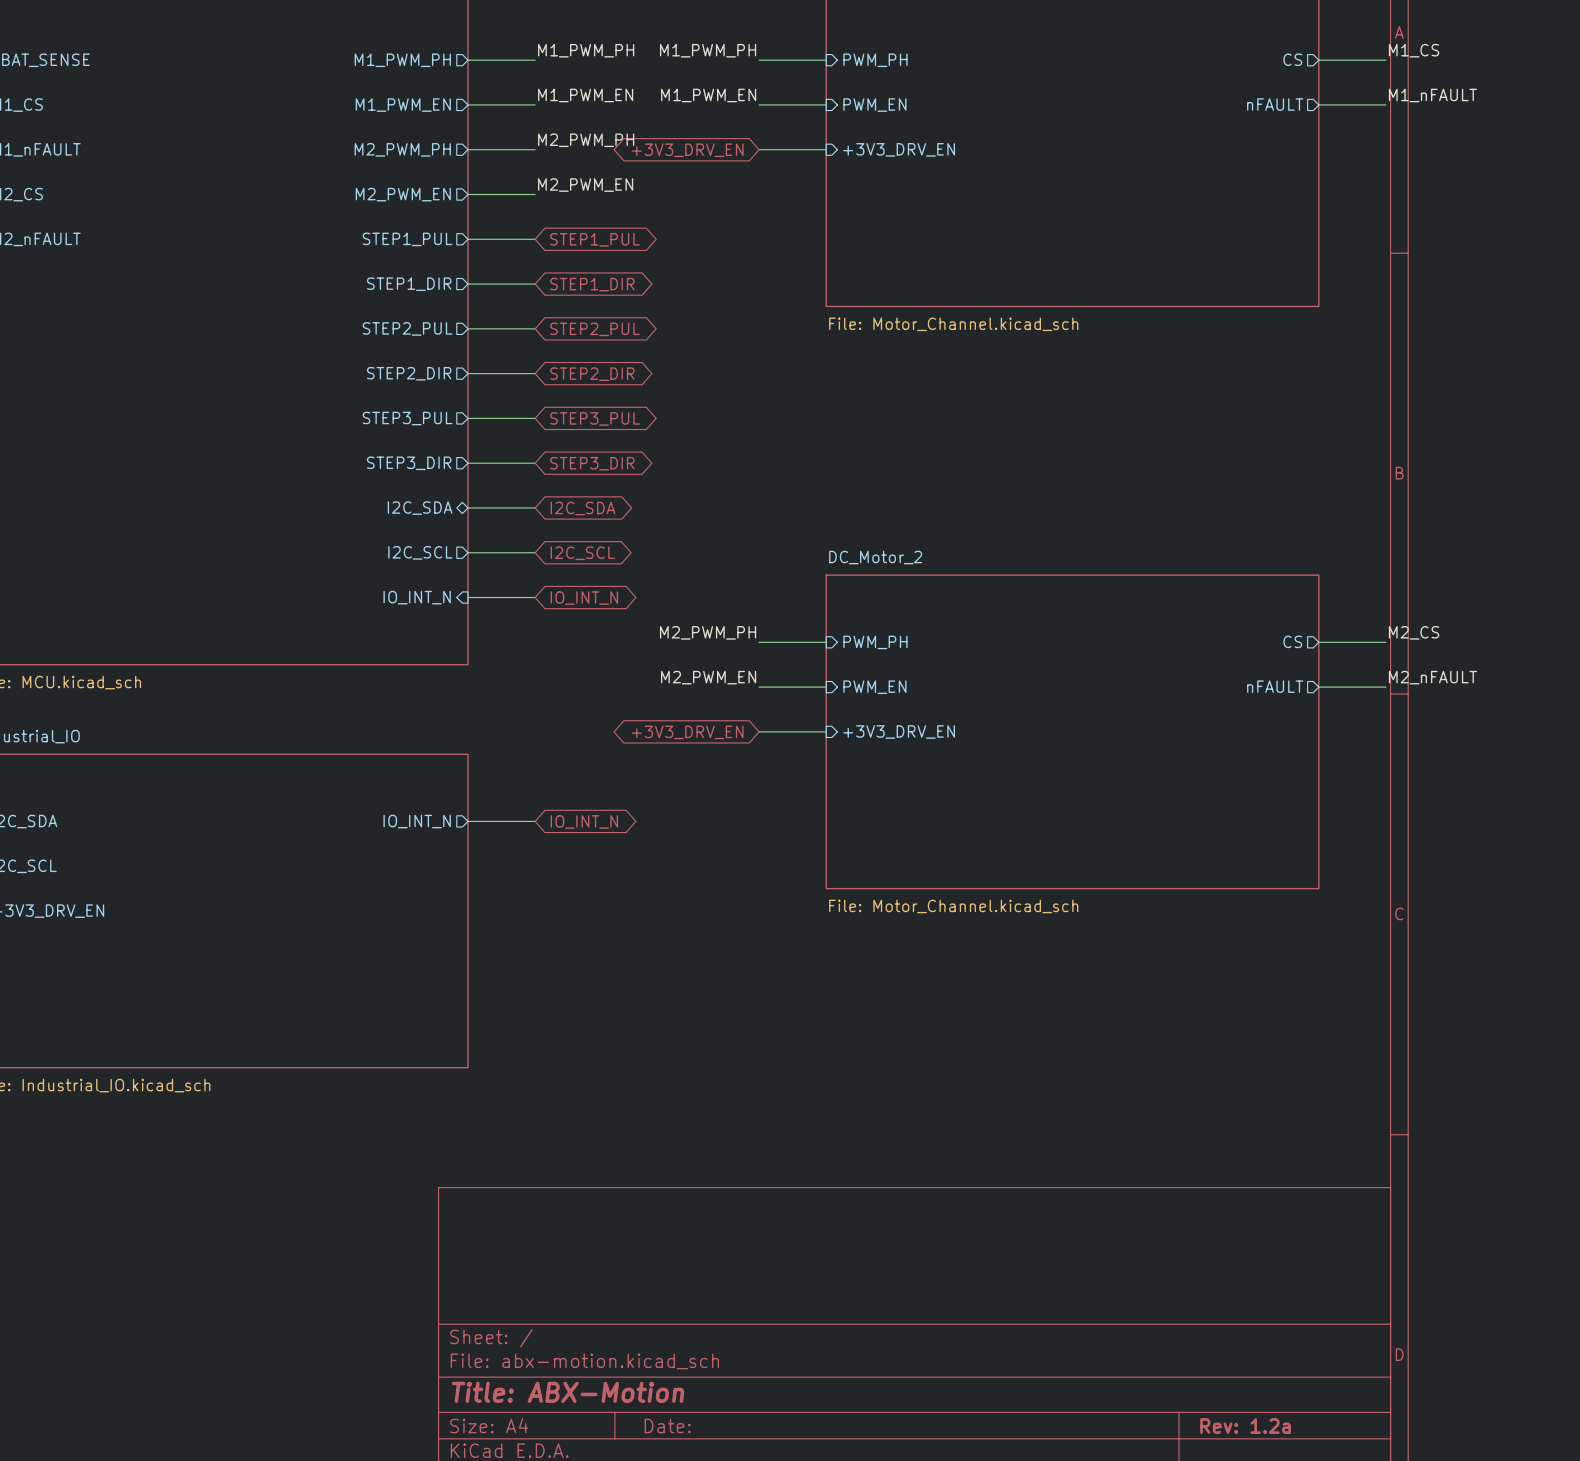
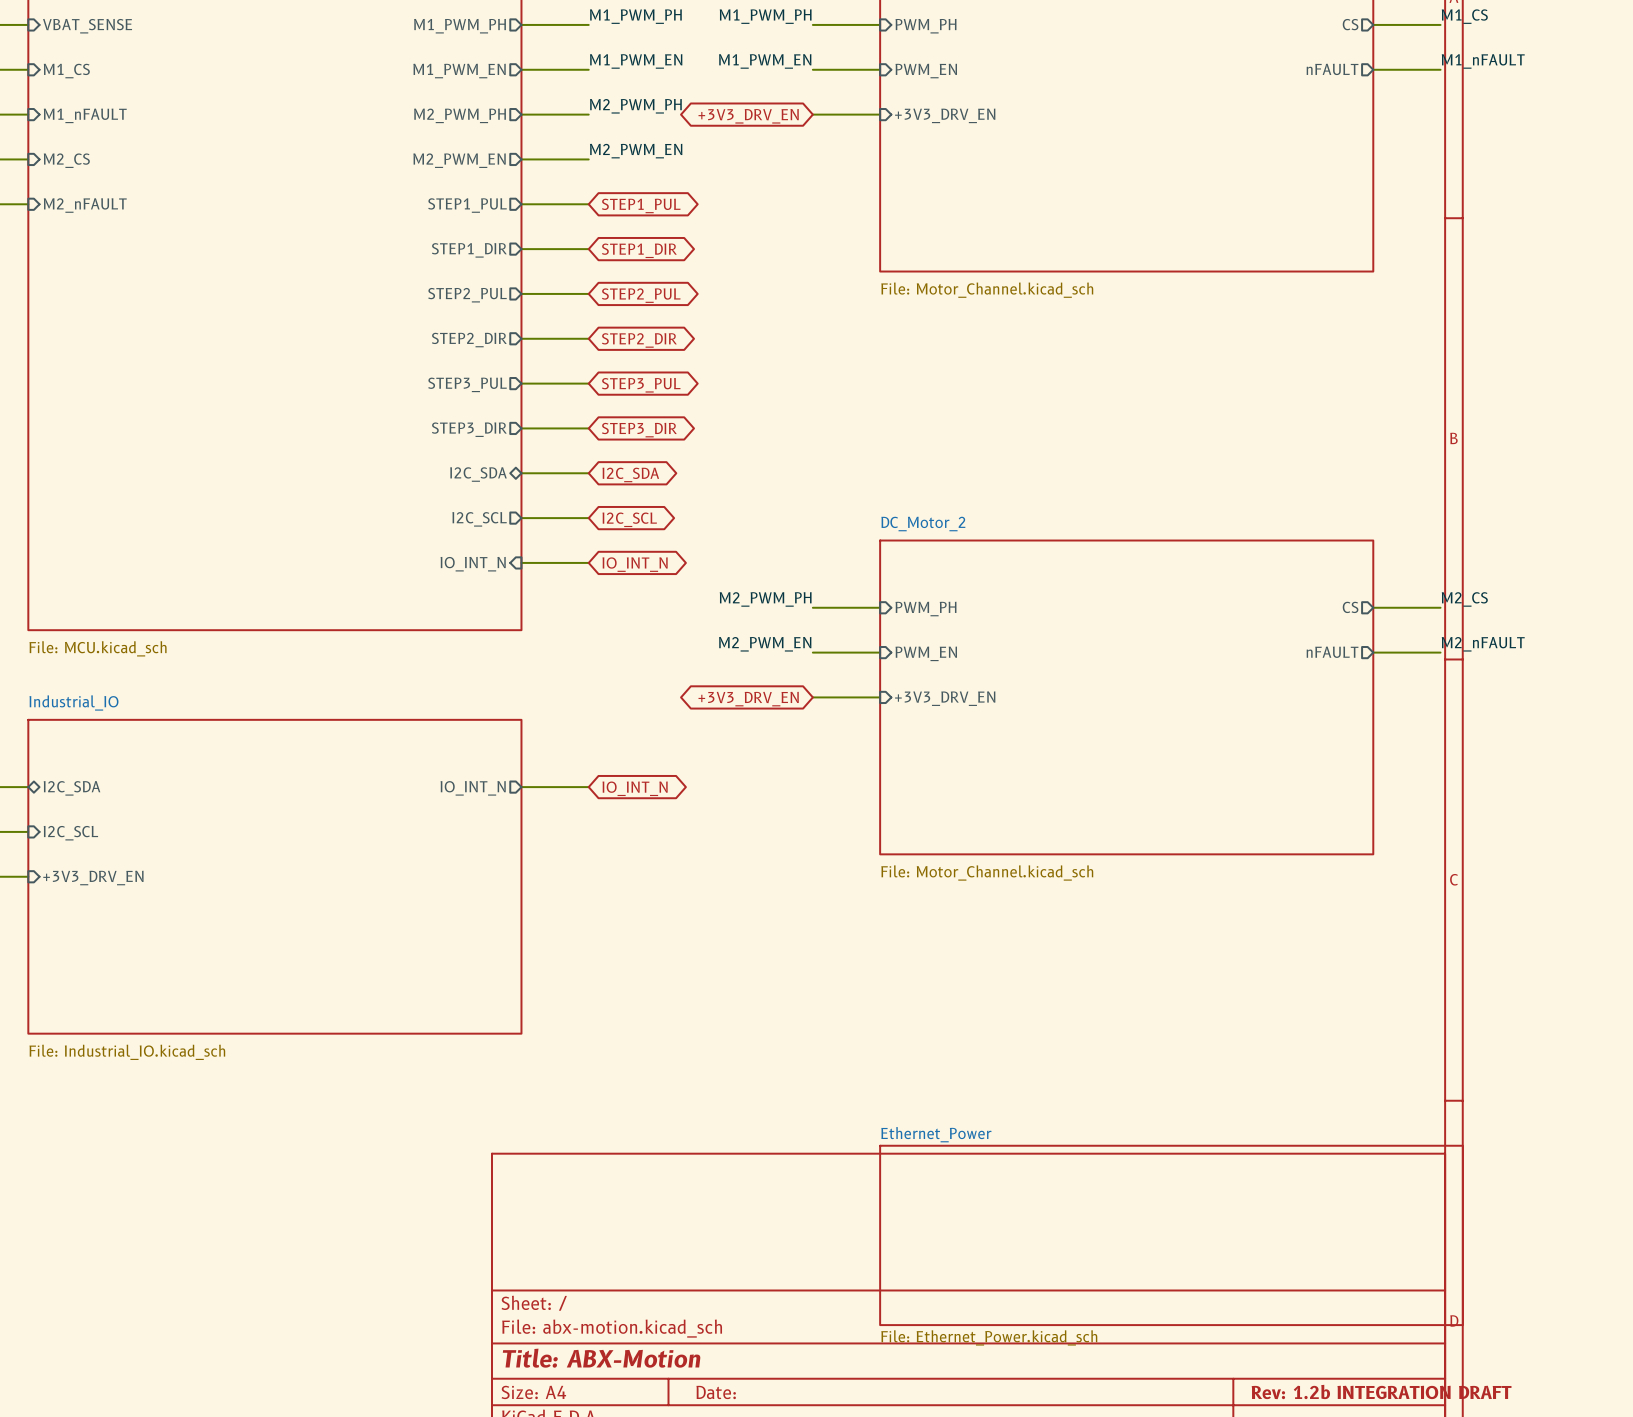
sheet Ethernet_Power: none -> File: Ethernet_Power.kicad_sch (1171, 1235)
title block: Rev: 1.2a (1245, 1426) -> Rev: 1.2b INTEGRATION DRAFT (1381, 1392)

